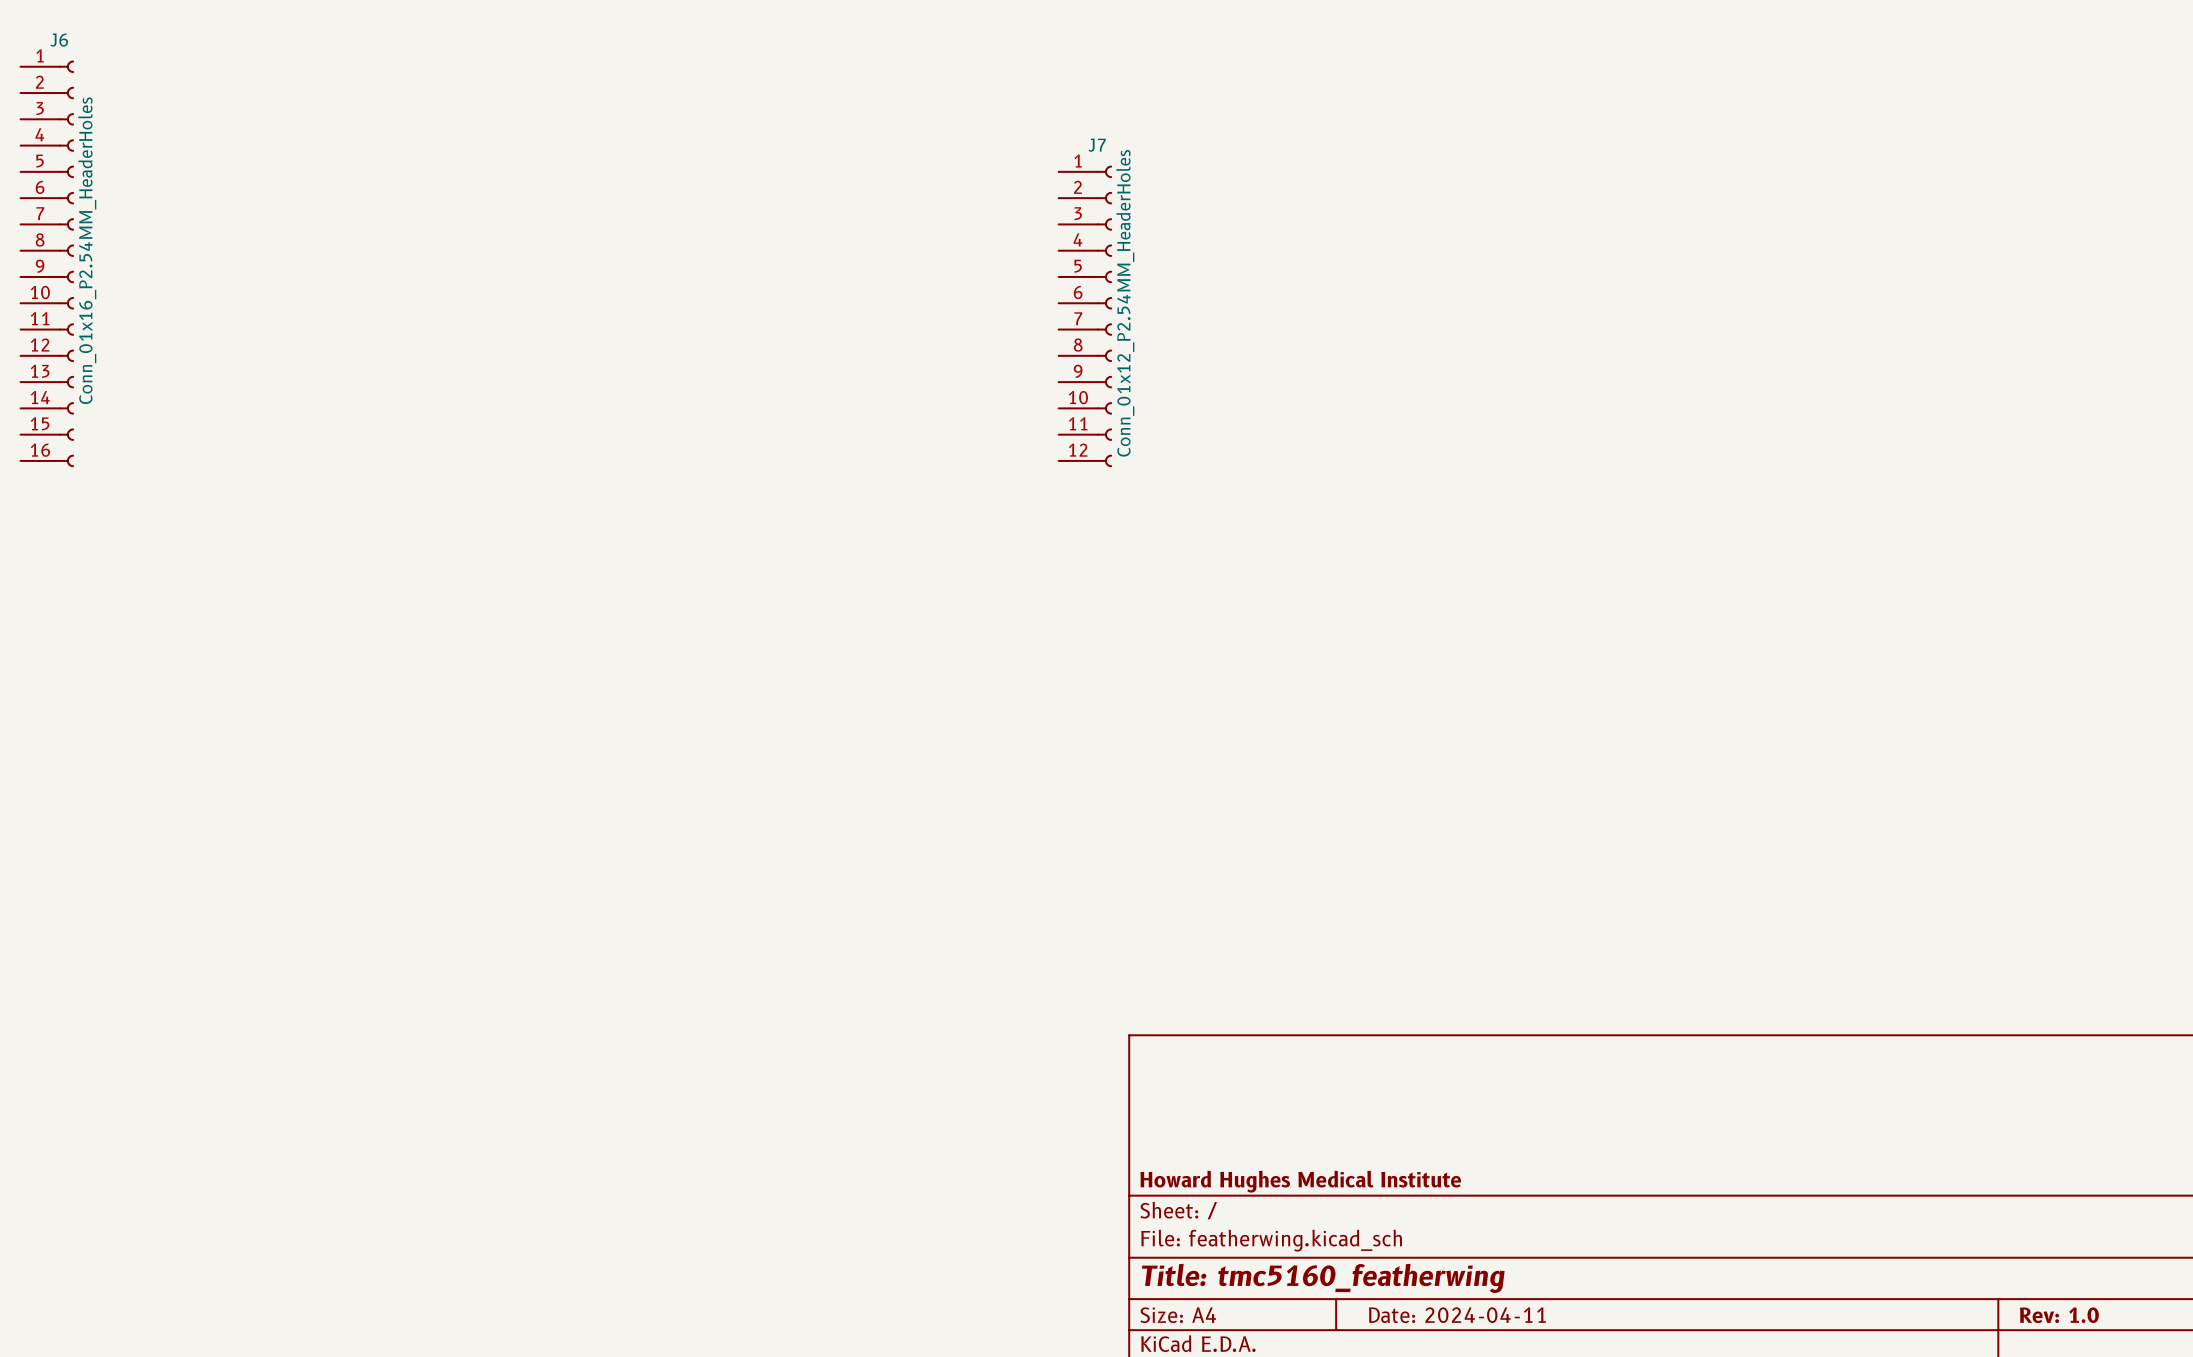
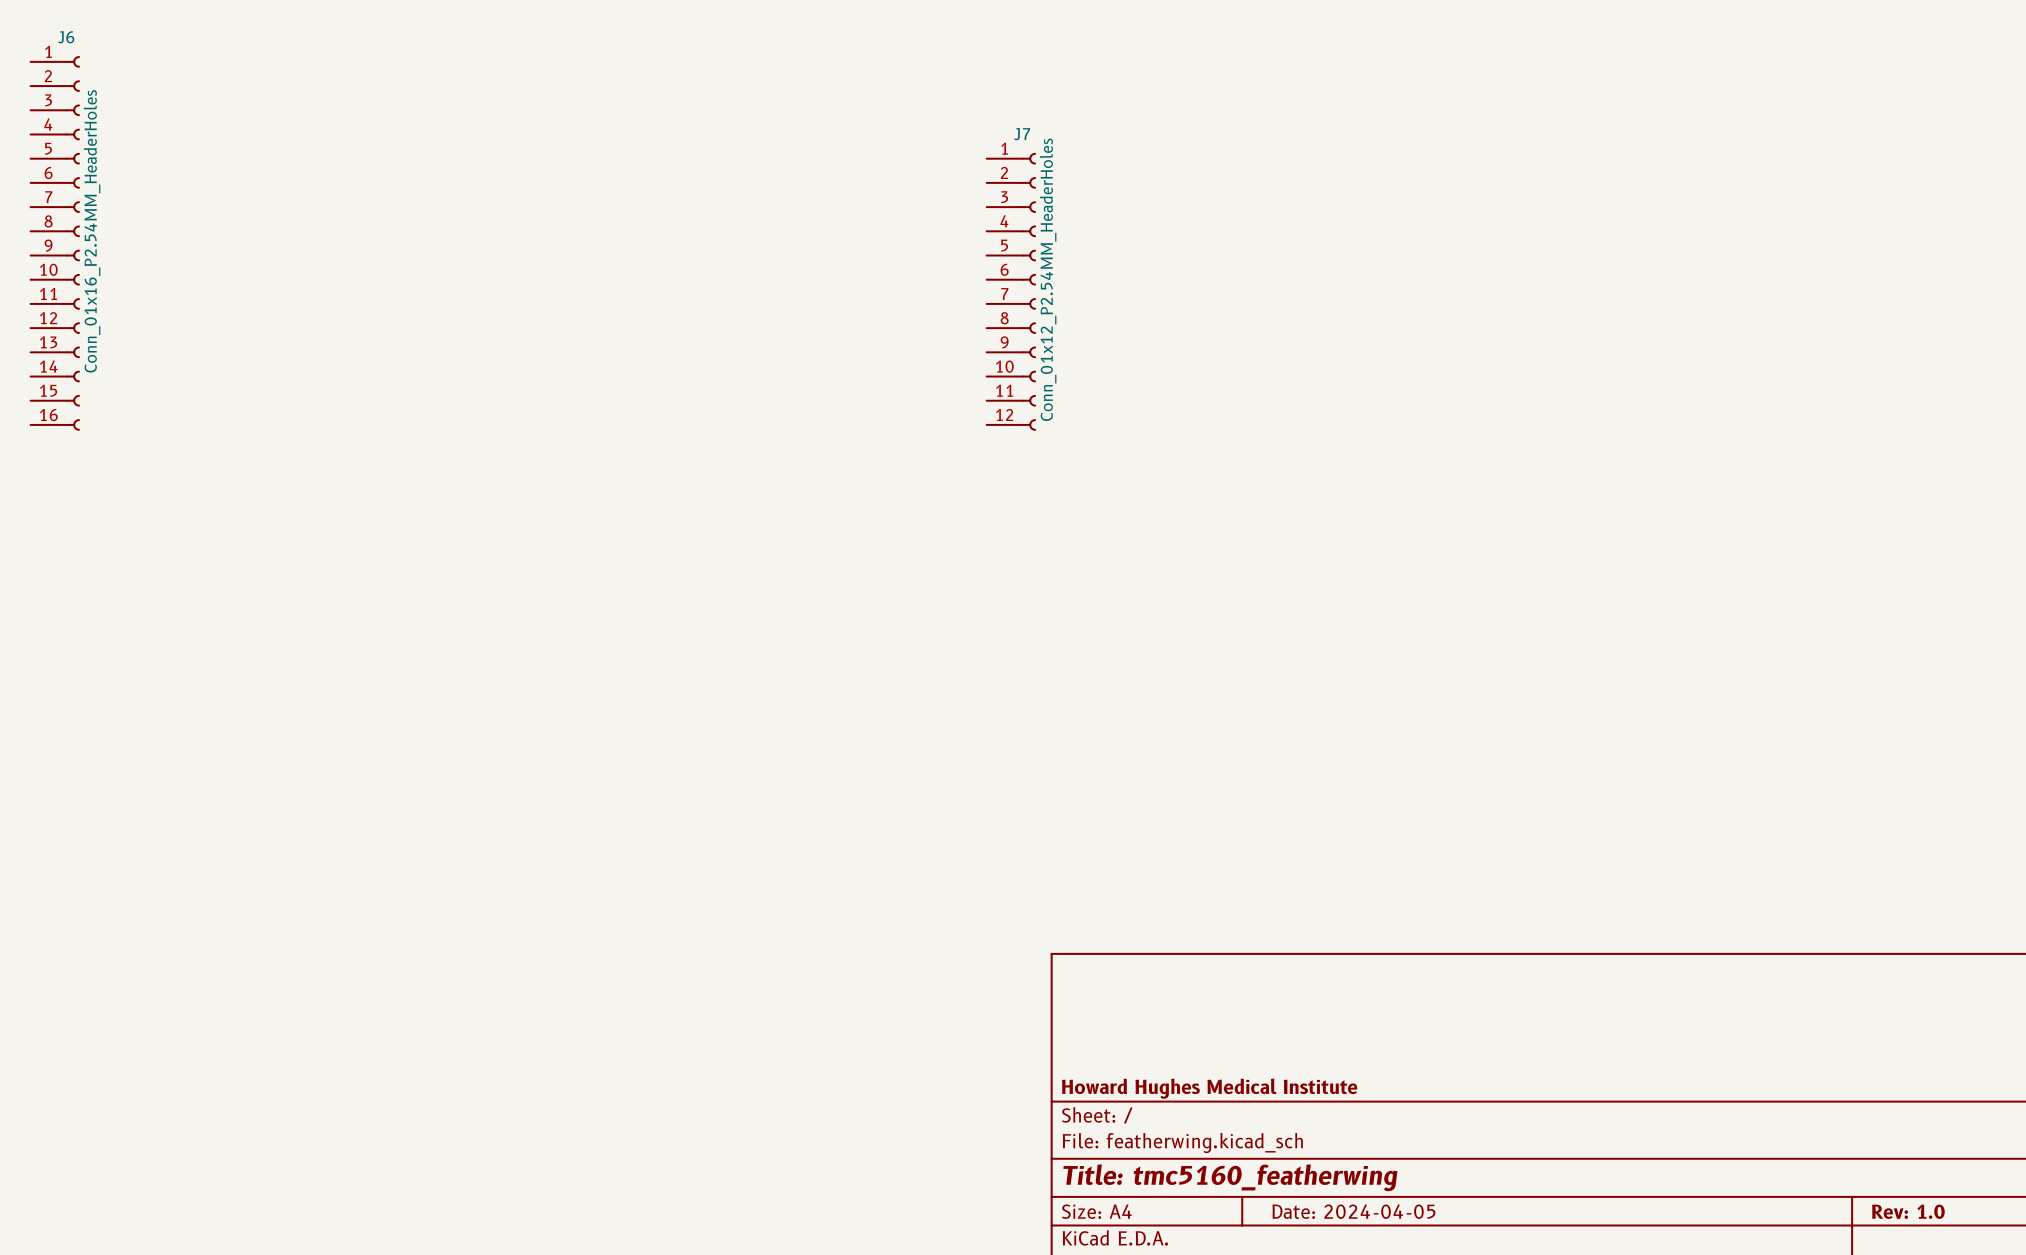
title block: Date: 2024-04-11 (1457, 1315) -> Date: 2024-04-05 (1353, 1211)

